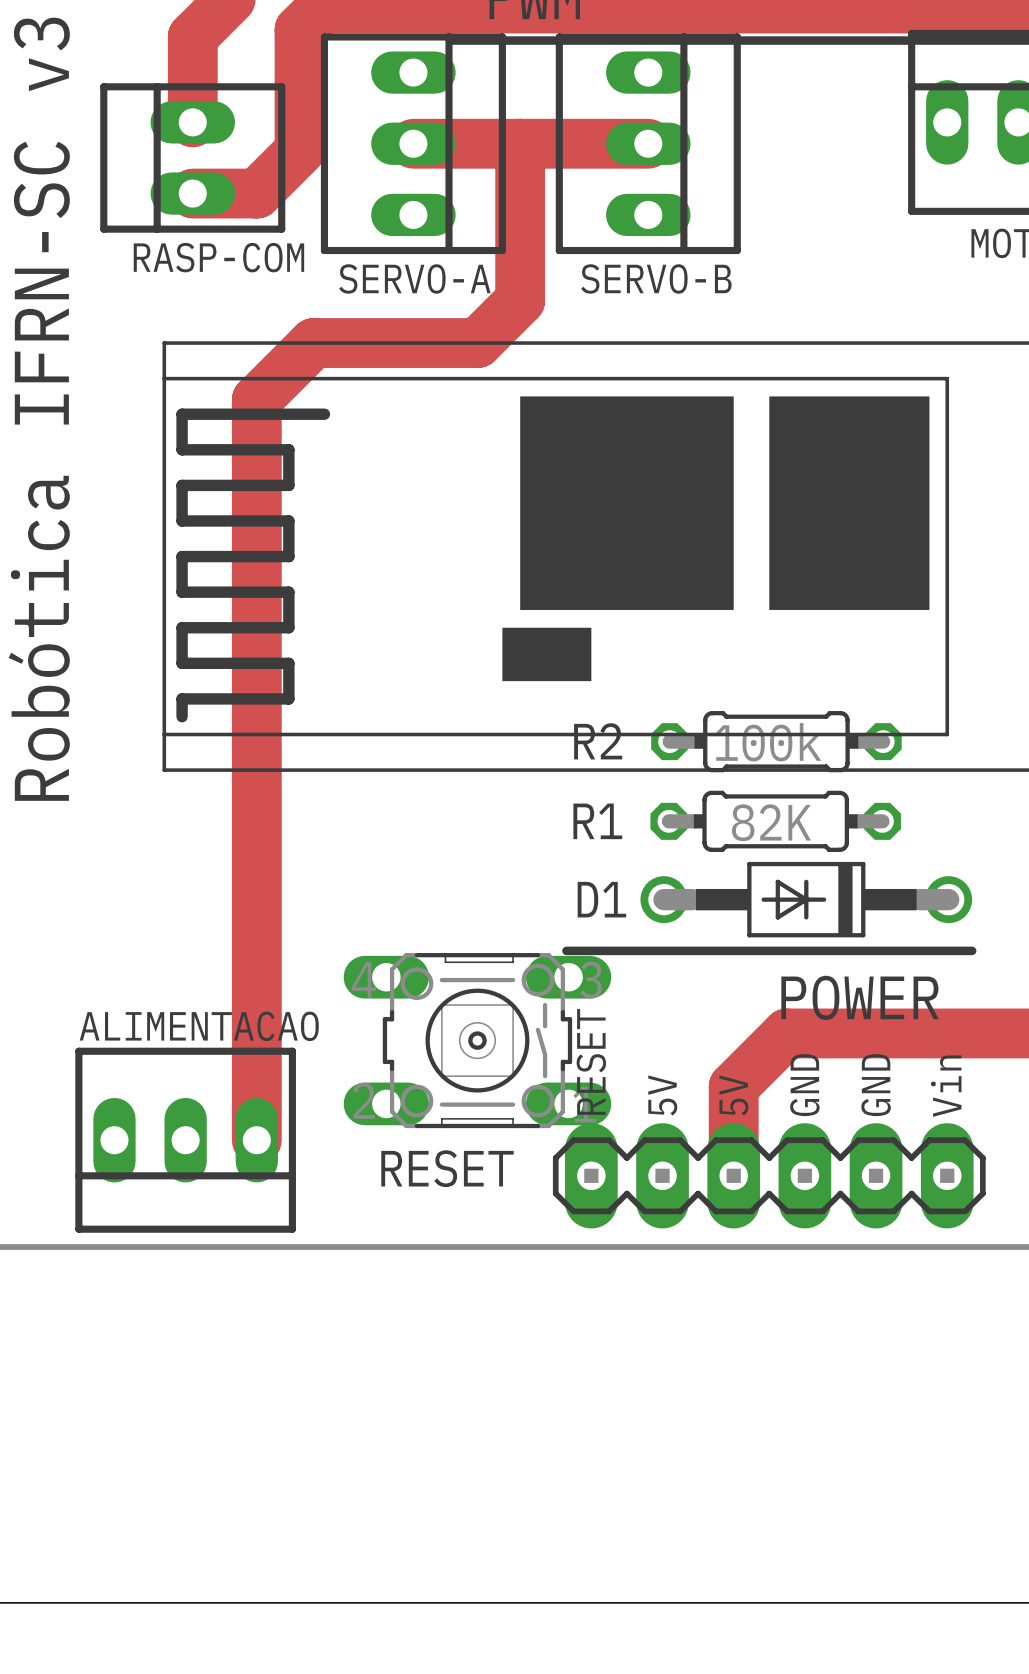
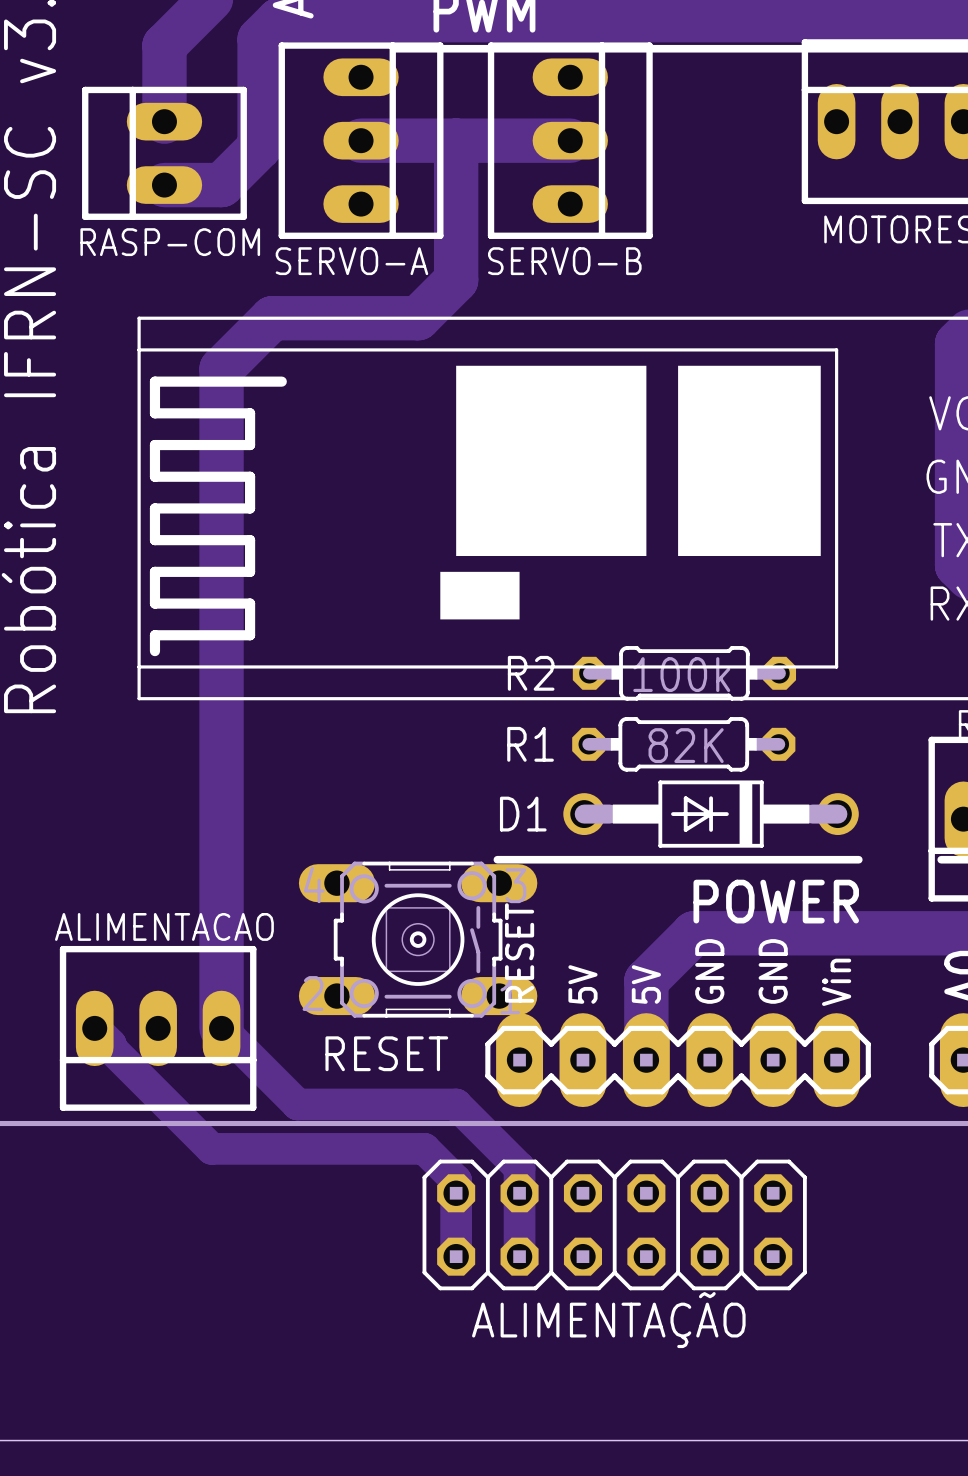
track: none -> (94, 1028) (110, 1044) (110, 1048) (211, 1148) (424, 1148) (456, 1180) (456, 1256)
track: none -> (221, 1028) (297, 1104) (456, 1104) (519, 1167) (519, 1256)
ALIMENTAÇÃO: none -> (614, 1224)

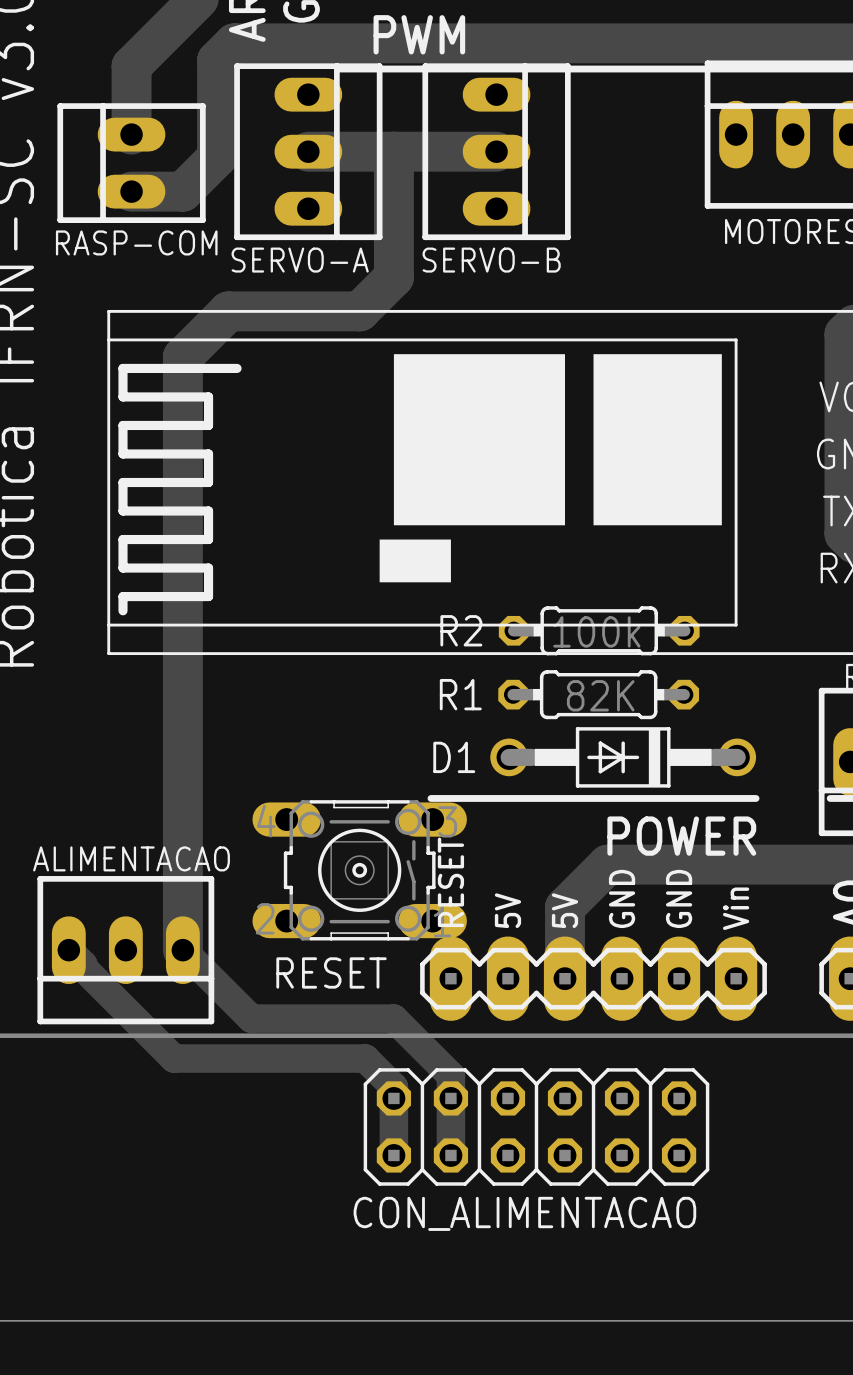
ALIMENTAÇÃO name: ALIMENTAÇÃO (608, 1320) -> CON_ALIMENTACAO (524, 1213)

